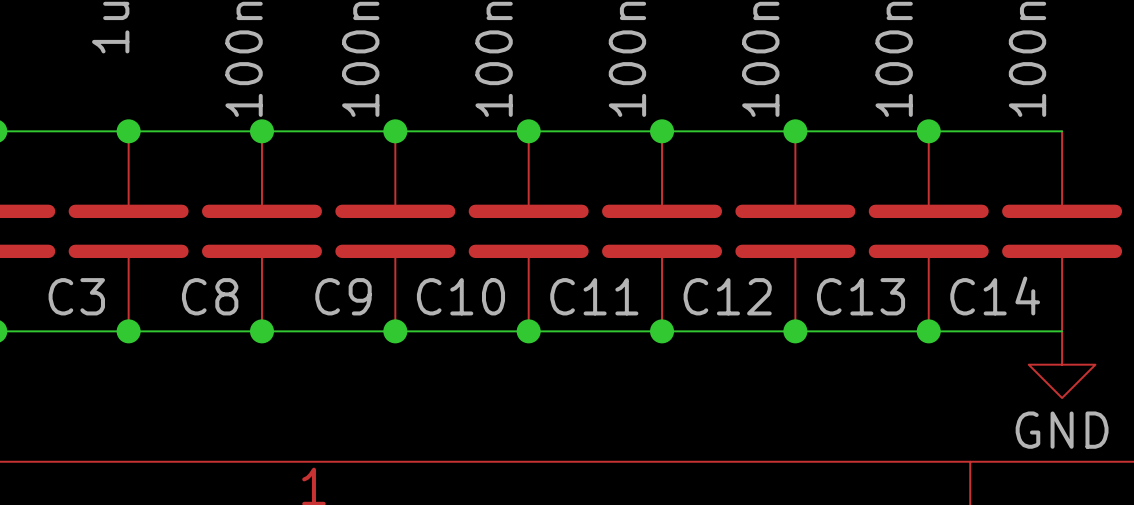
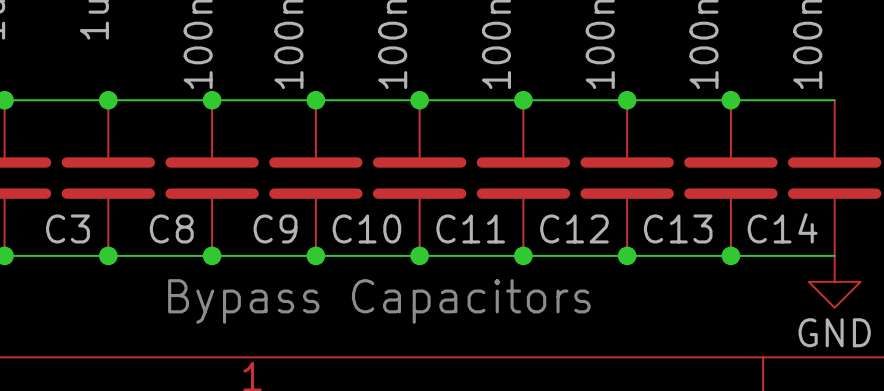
text: none -> Bypass Capacitors (379, 301)

